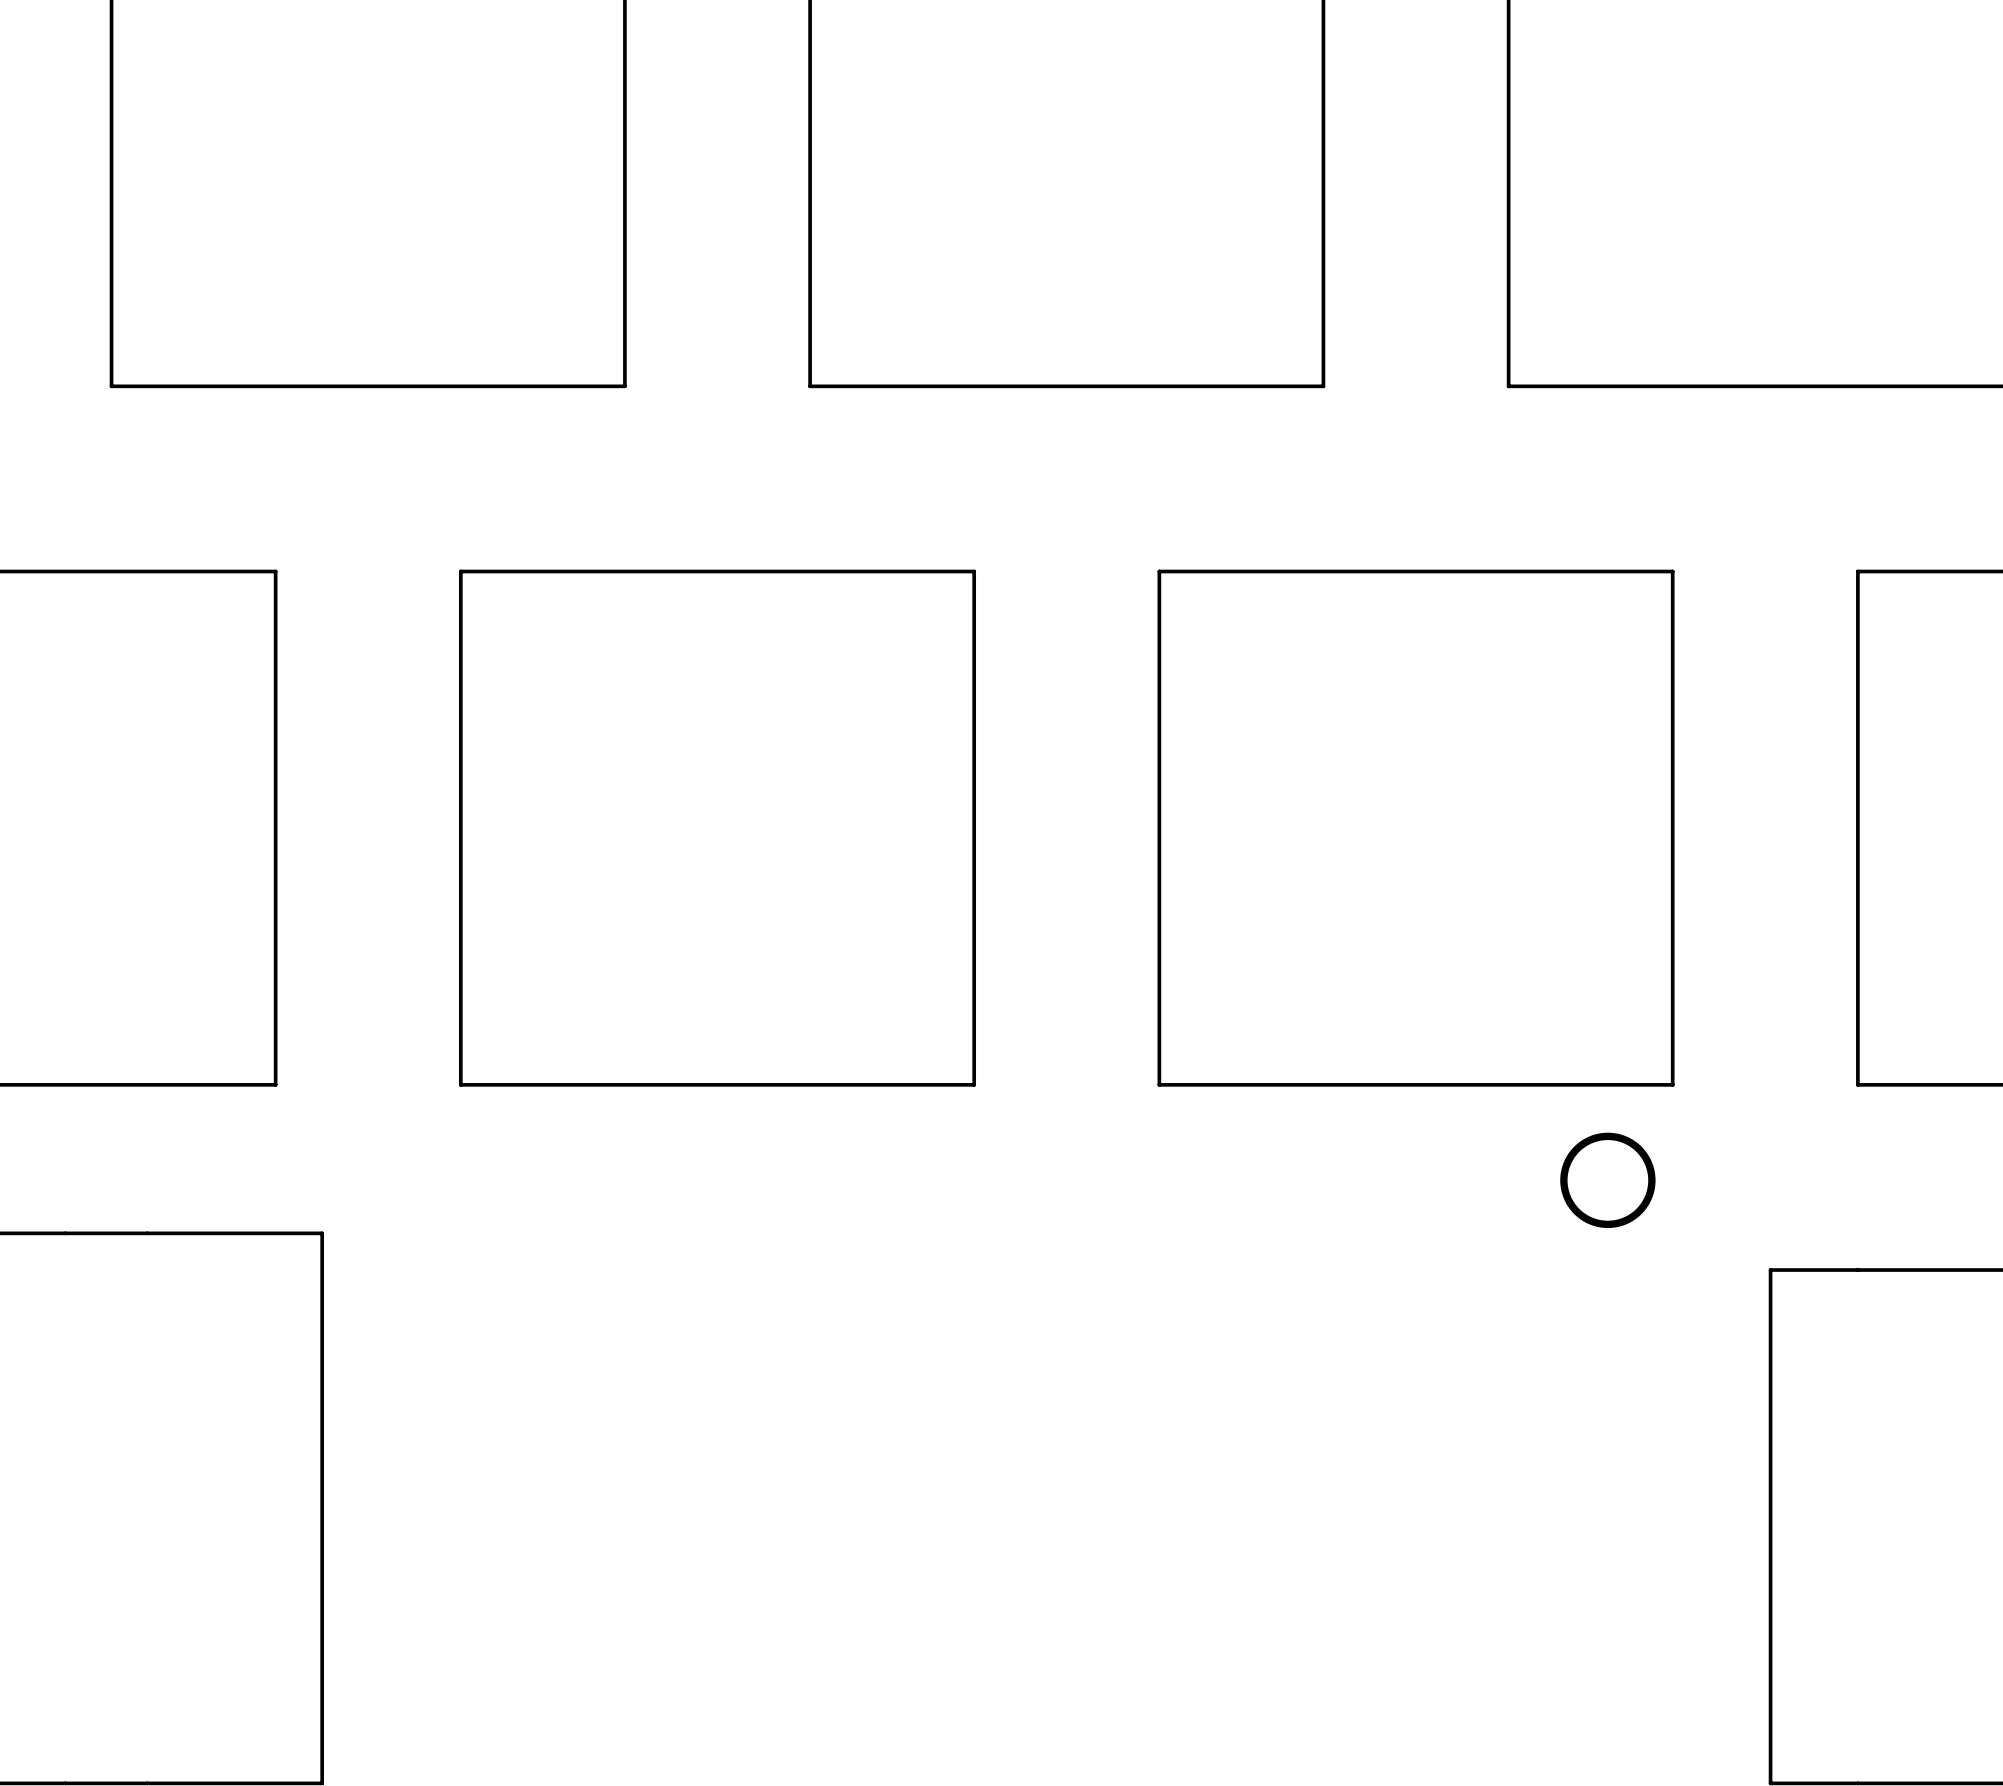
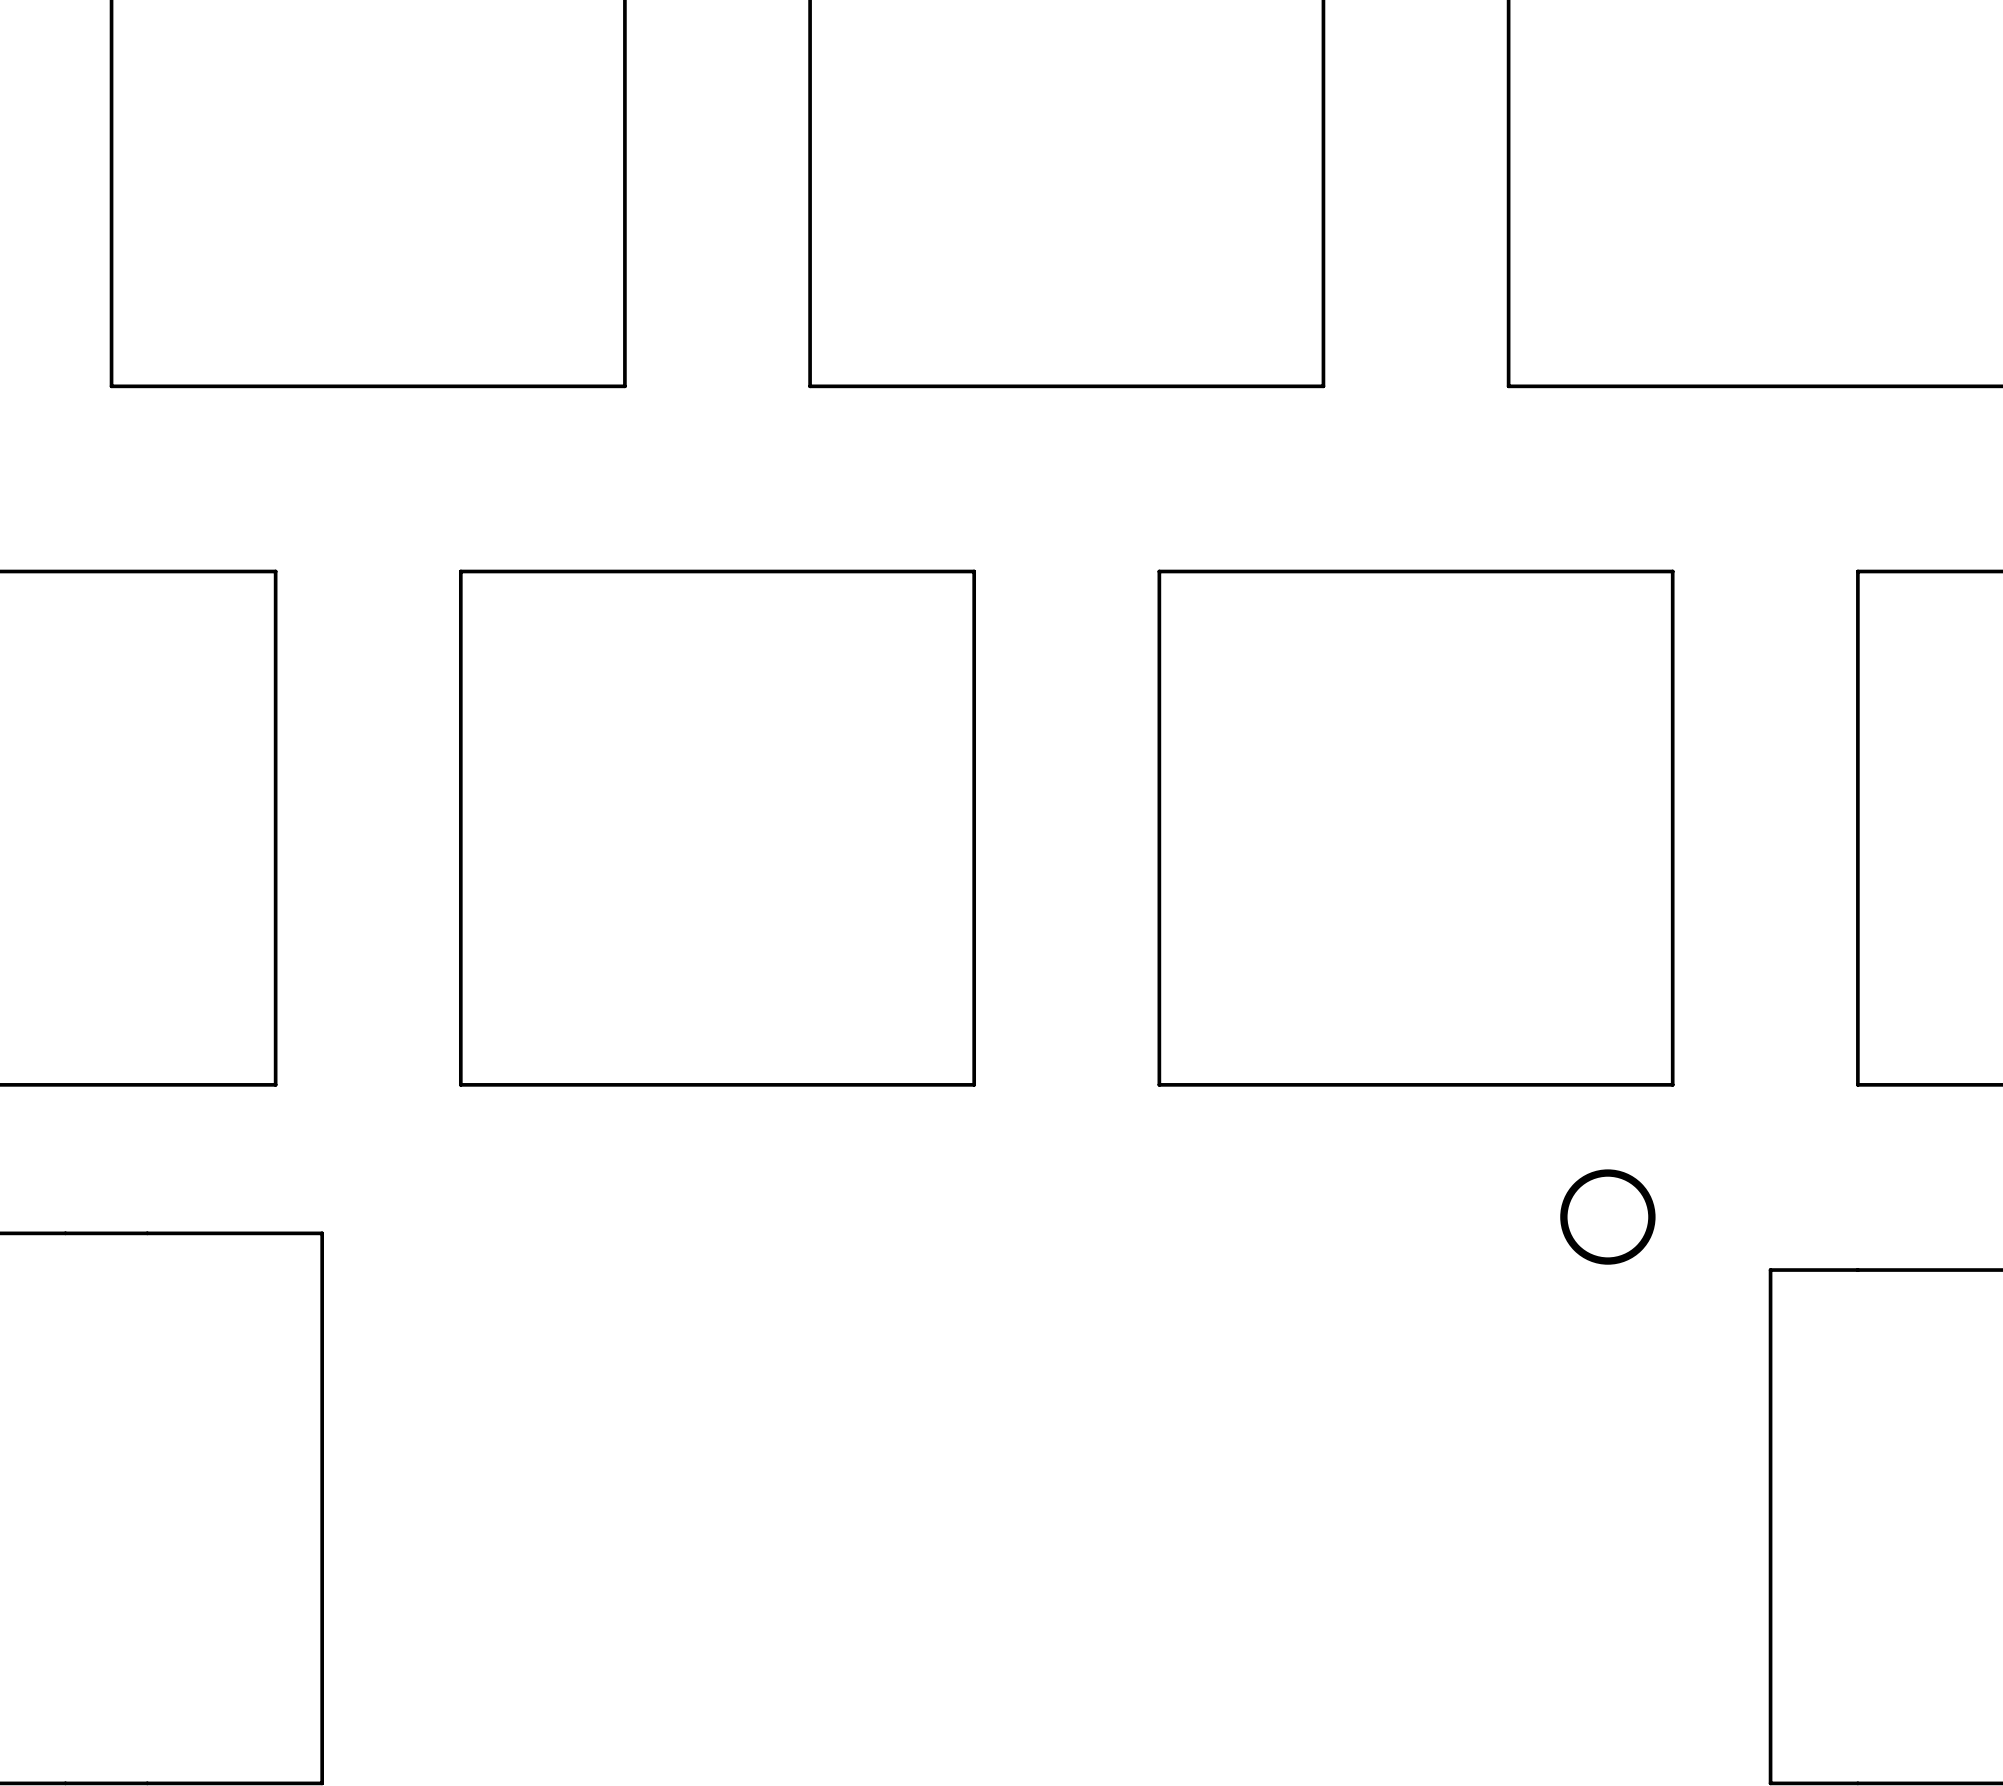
round board edge position: (1607, 1180) -> (1607, 1217)

